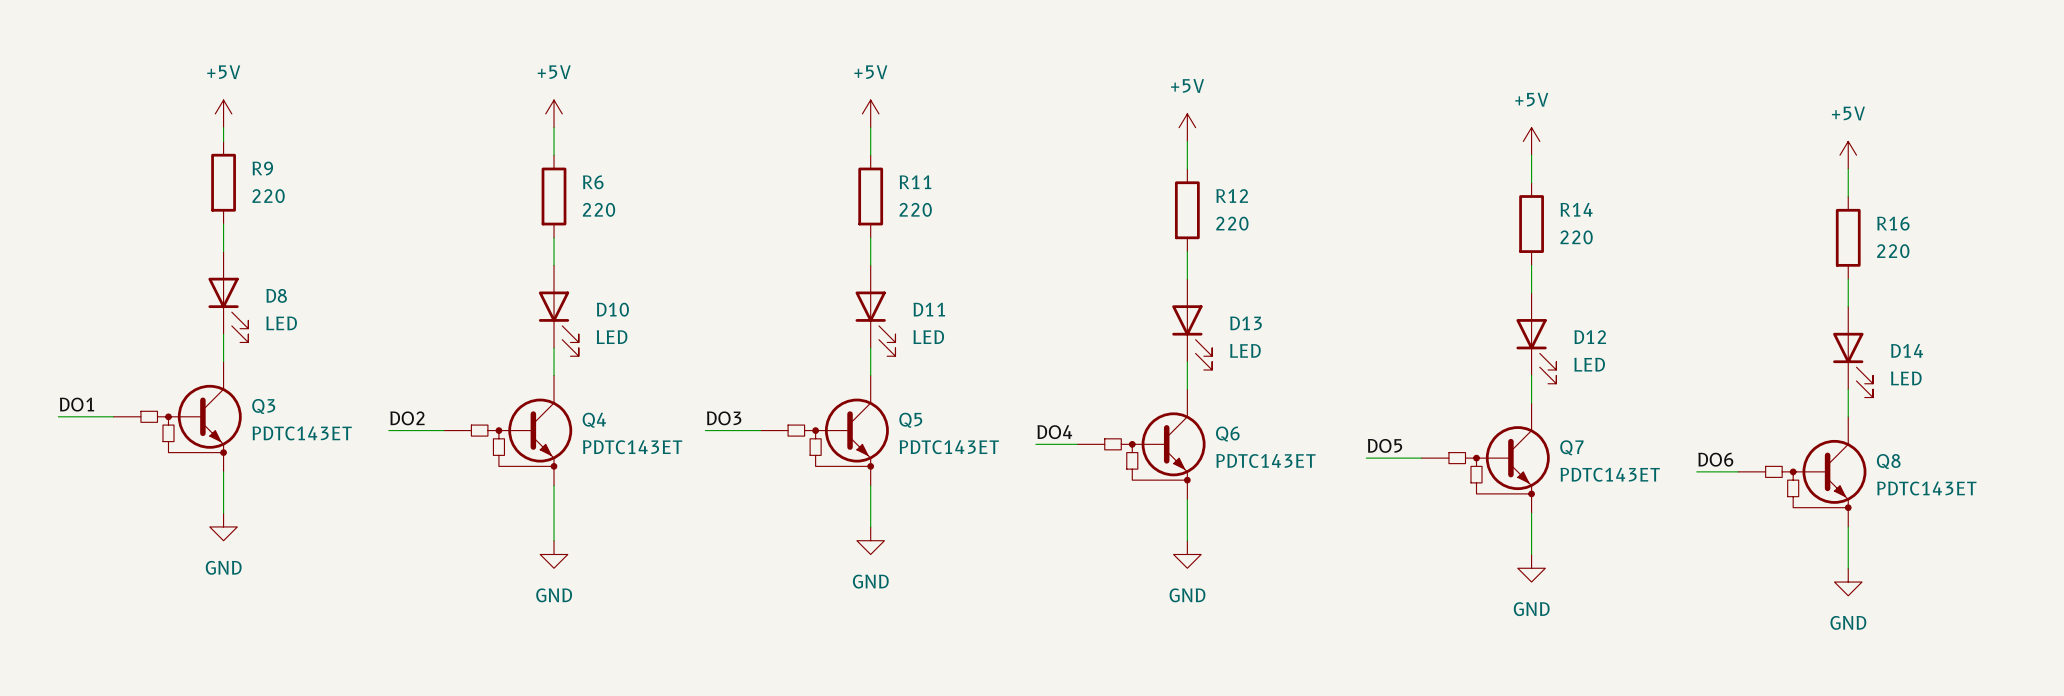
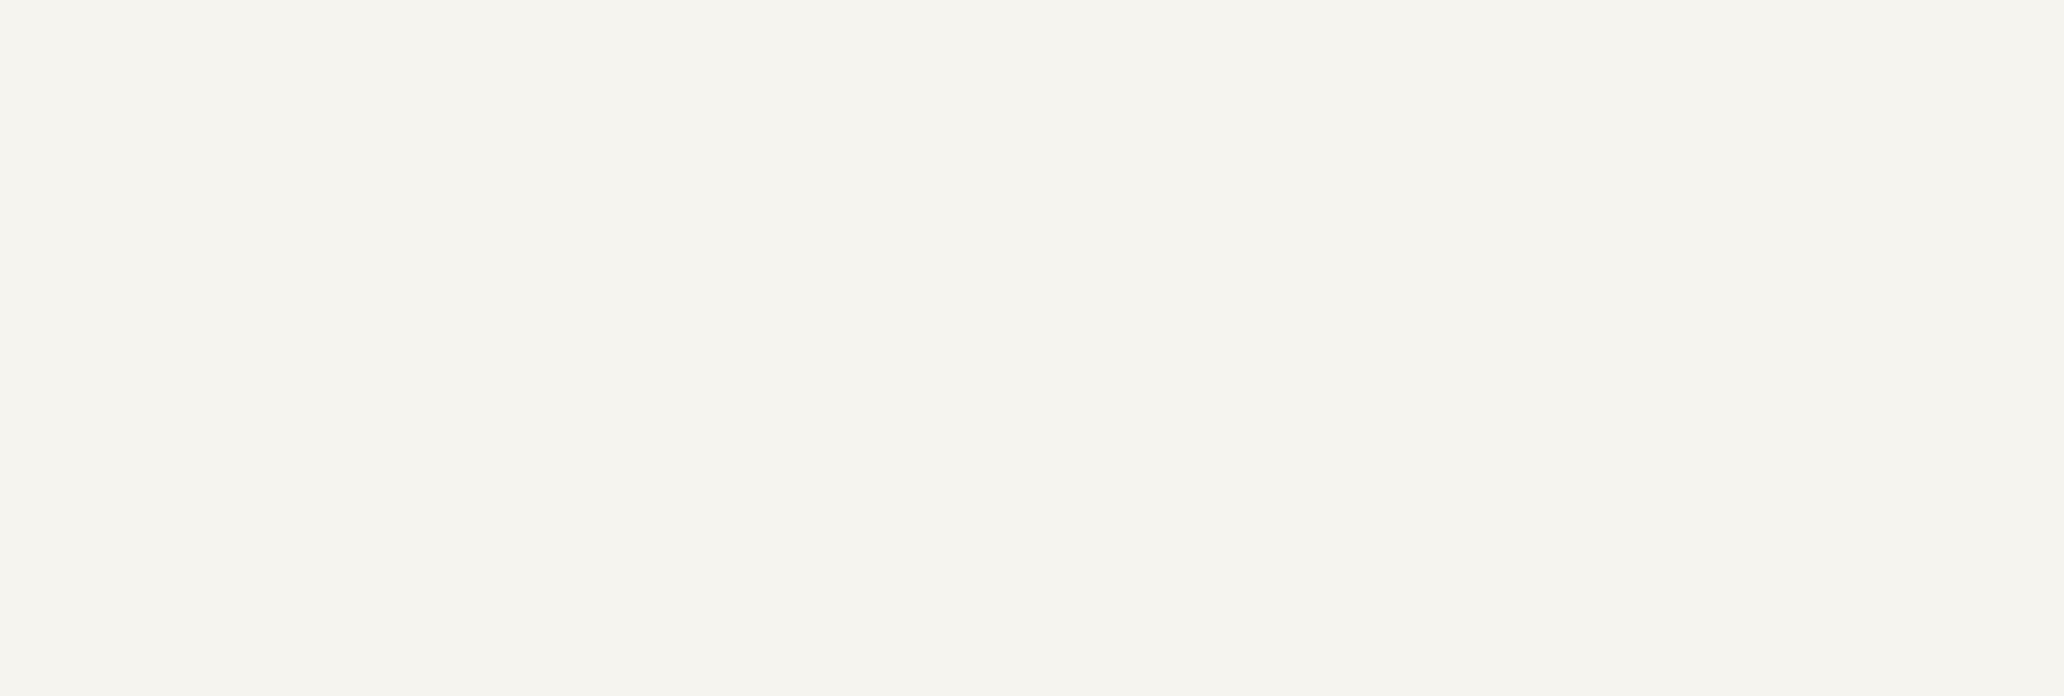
power symbol: +5V (223, 113) -> none
power symbol: +5V (554, 113) -> none
power symbol: +5V (870, 113) -> none
wire: (223, 127) (223, 141) -> none
wire: (554, 127) (554, 155) -> none
wire: (870, 127) (870, 155) -> none
power symbol: +5V (1187, 127) -> none
wire: (1187, 141) (1187, 168) -> none
power symbol: +5V (1531, 141) -> none
wire: (1531, 155) (1531, 182) -> none
power symbol: +5V (1848, 155) -> none
wire: (1848, 168) (1848, 196) -> none
R9: 220 (223, 182) -> none
R6: 220 (554, 196) -> none
R11: 220 (870, 196) -> none
R12: 220 (1187, 210) -> none
wire: (223, 224) (223, 251) -> none
R14: 220 (1531, 224) -> none
wire: (554, 237) (554, 265) -> none
wire: (870, 237) (870, 265) -> none
R16: 220 (1848, 237) -> none
wire: (1187, 251) (1187, 279) -> none
wire: (1531, 265) (1531, 292) -> none
wire: (1848, 279) (1848, 306) -> none
D8: LED (228, 297) -> none
D10: LED (558, 310) -> none
D11: LED (875, 310) -> none
D13: LED (1192, 324) -> none
wire: (223, 334) (223, 361) -> none
D12: LED (1536, 338) -> none
wire: (554, 347) (554, 375) -> none
wire: (870, 347) (870, 375) -> none
D14: LED (1853, 352) -> none
wire: (1187, 361) (1187, 389) -> none
wire: (1531, 375) (1531, 403) -> none
wire: (1848, 389) (1848, 416) -> none
label: DO1 (77, 404) -> none
wire: (58, 416) (113, 416) -> none
Q3: PDTC143ET (177, 416) -> none
label: DO2 (407, 418) -> none
label: DO3 (724, 418) -> none
wire: (388, 430) (443, 430) -> none
Q4: PDTC143ET (508, 430) -> none
wire: (705, 430) (760, 430) -> none
Q5: PDTC143ET (824, 430) -> none
label: DO4 (1054, 432) -> none
wire: (1035, 444) (1077, 444) -> none
Q6: PDTC143ET (1141, 444) -> none
label: DO5 (1385, 445) -> none
wire: (1366, 458) (1421, 458) -> none
Q7: PDTC143ET (1485, 458) -> none
label: DO6 (1715, 459) -> none
wire: (223, 471) (223, 513) -> none
wire: (1696, 471) (1738, 471) -> none
Q8: PDTC143ET (1802, 471) -> none
wire: (554, 485) (554, 540) -> none
wire: (870, 485) (870, 526) -> none
wire: (1187, 499) (1187, 540) -> none
wire: (1531, 513) (1531, 554) -> none
power symbol: GND (223, 526) -> none
wire: (1848, 526) (1848, 568) -> none
power symbol: GND (870, 540) -> none
power symbol: GND (554, 554) -> none
power symbol: GND (1187, 554) -> none
power symbol: GND (1531, 568) -> none
power symbol: GND (1848, 582) -> none

